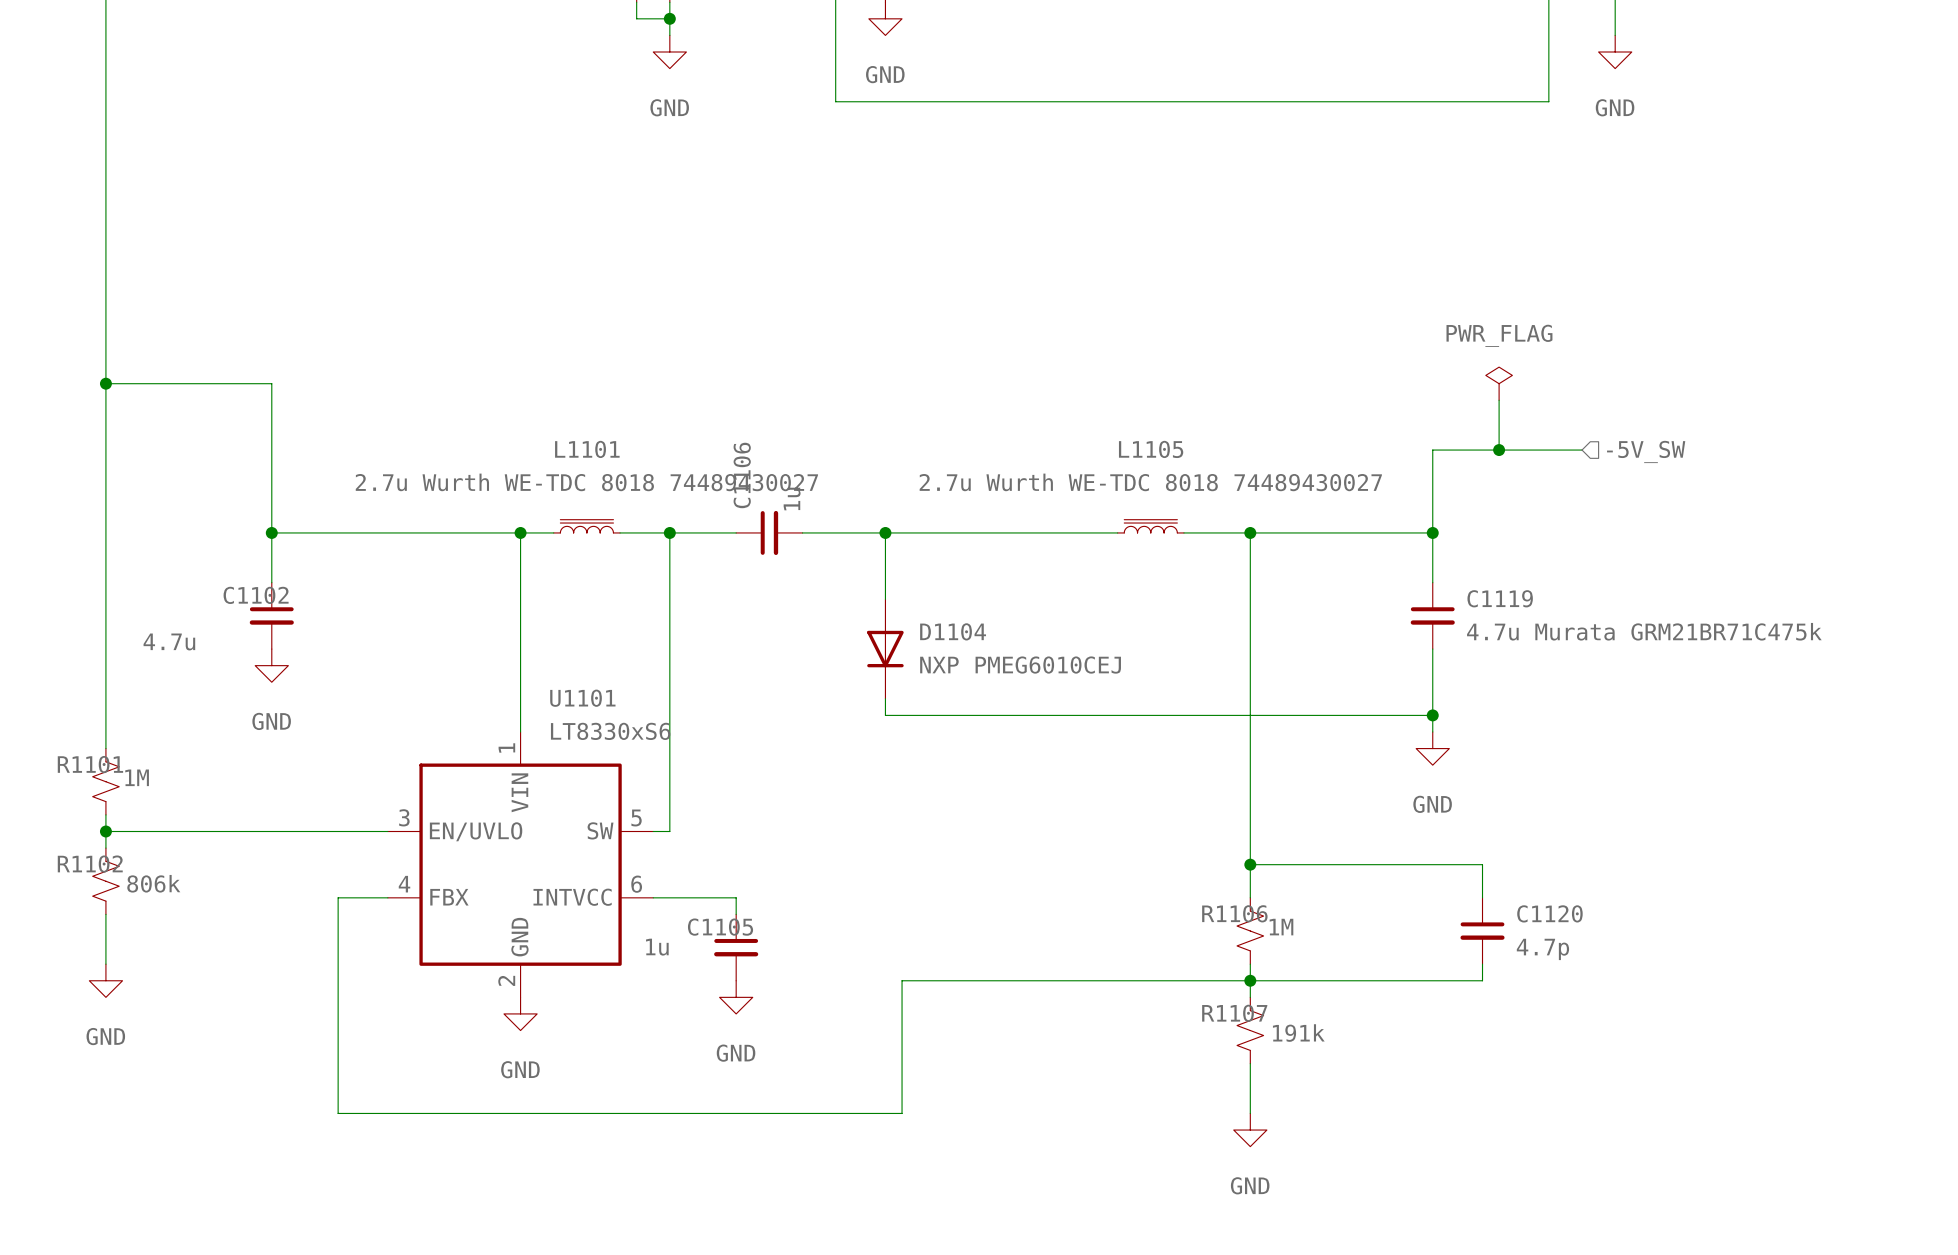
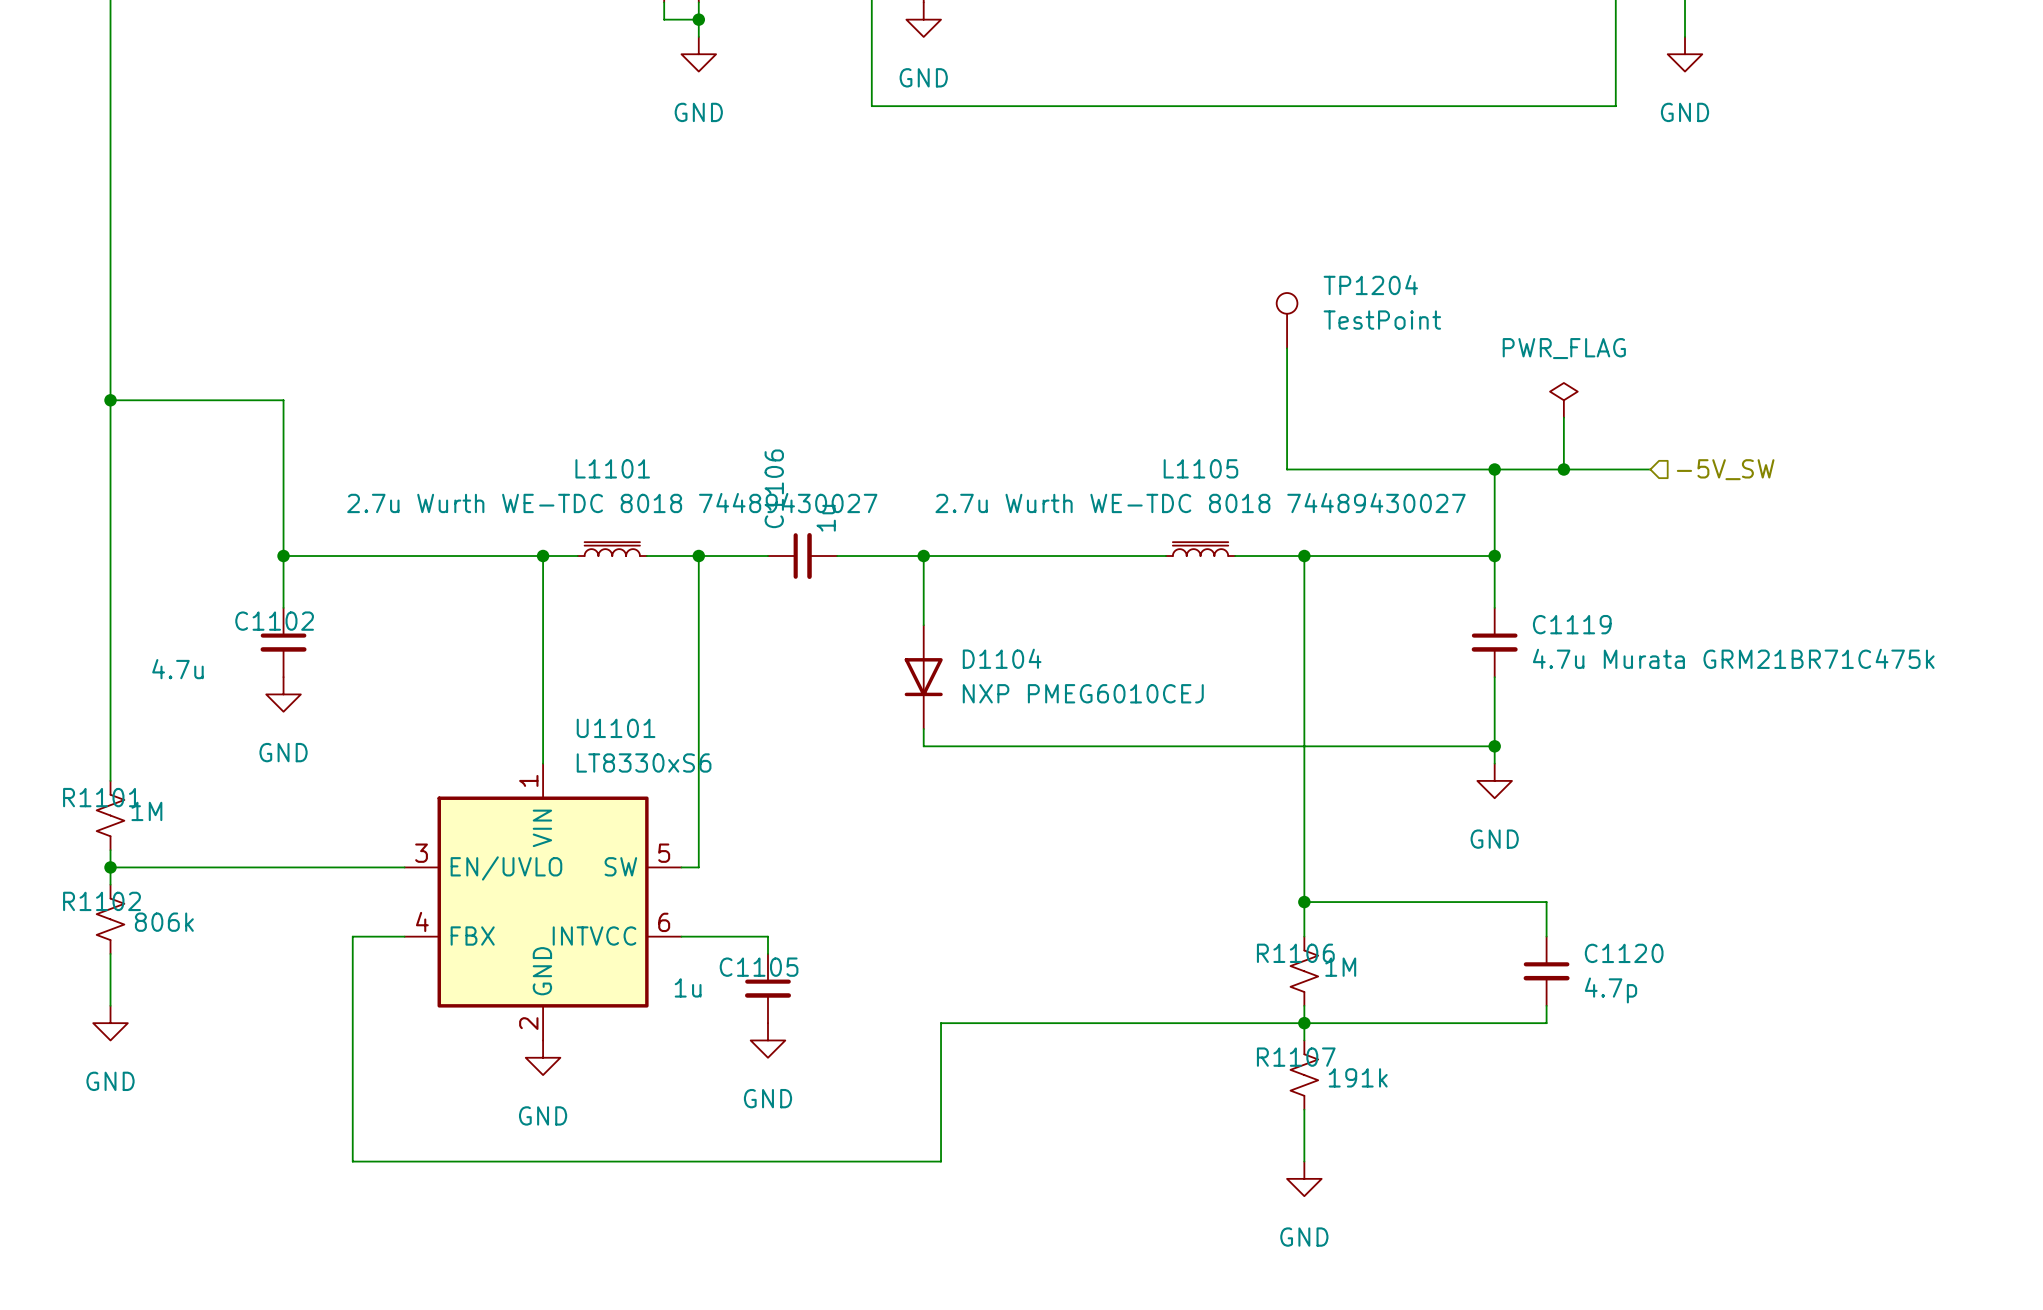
TP1204: none -> TestPoint (1287, 320)
wire: none -> (1287, 348) (1287, 469) (1494, 469)
junction: none -> (1494, 469)

